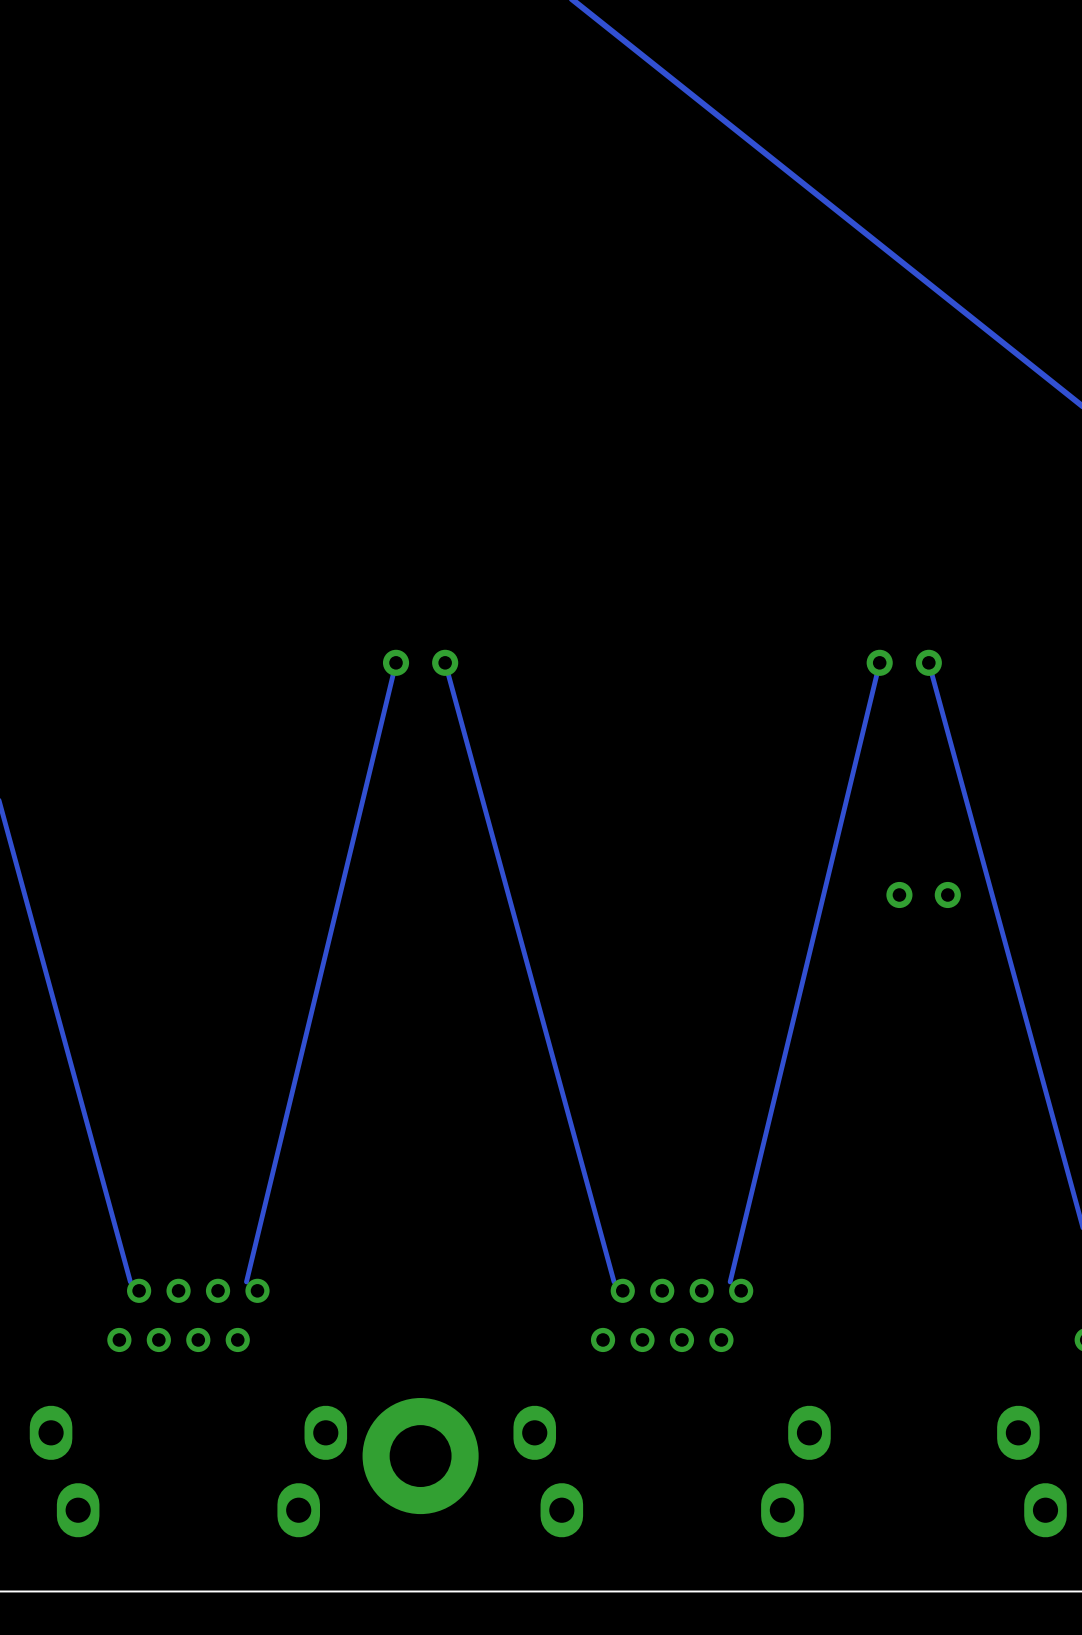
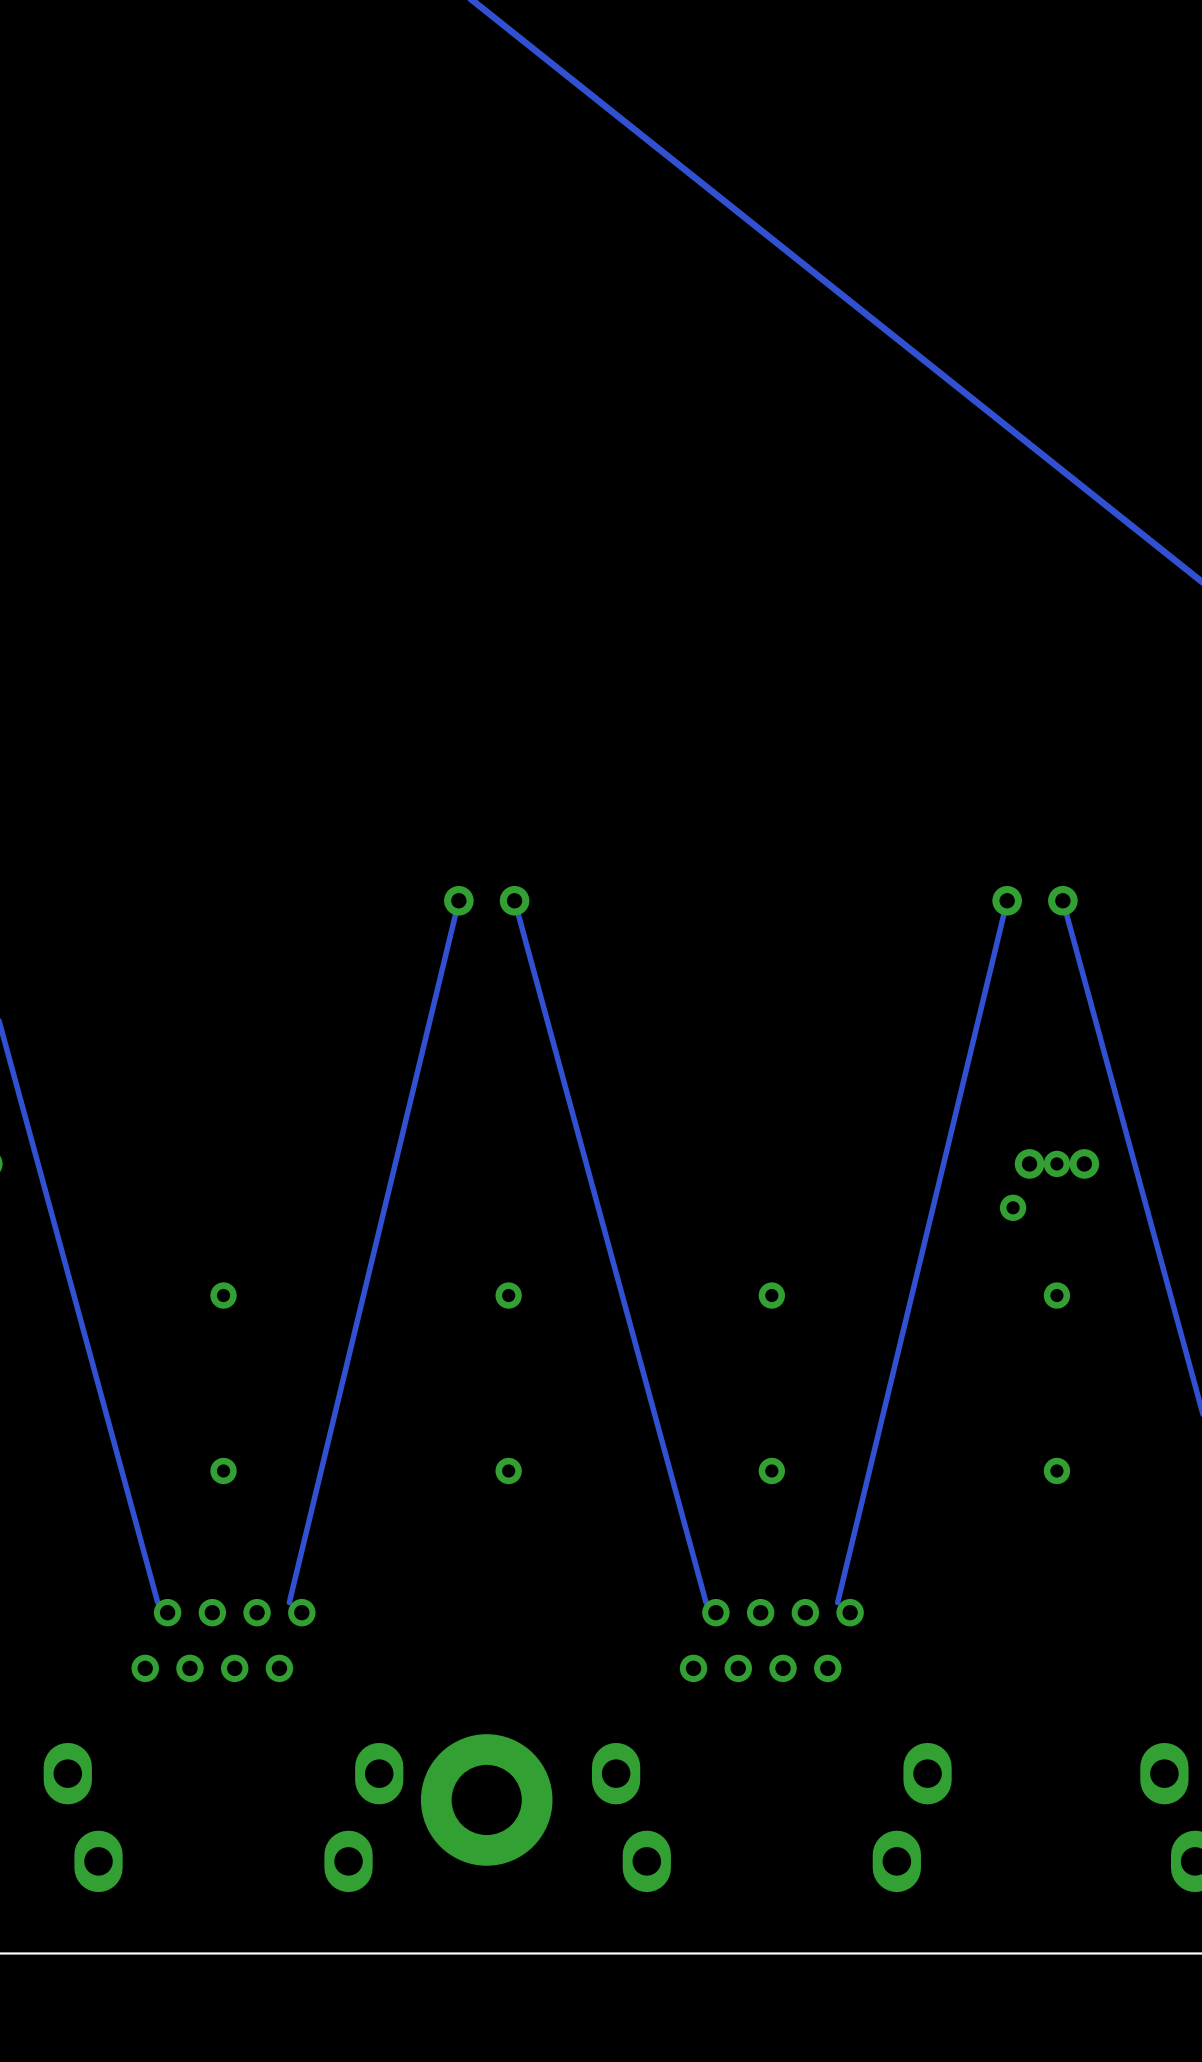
via: none -> (1056, 1163)
via: none -> (1013, 1207)
via: none -> (223, 1295)
via: none -> (508, 1295)
via: none -> (771, 1295)
via: none -> (1056, 1295)
via: none -> (223, 1470)
via: none -> (508, 1470)
via: none -> (771, 1470)
via: none -> (1056, 1470)

